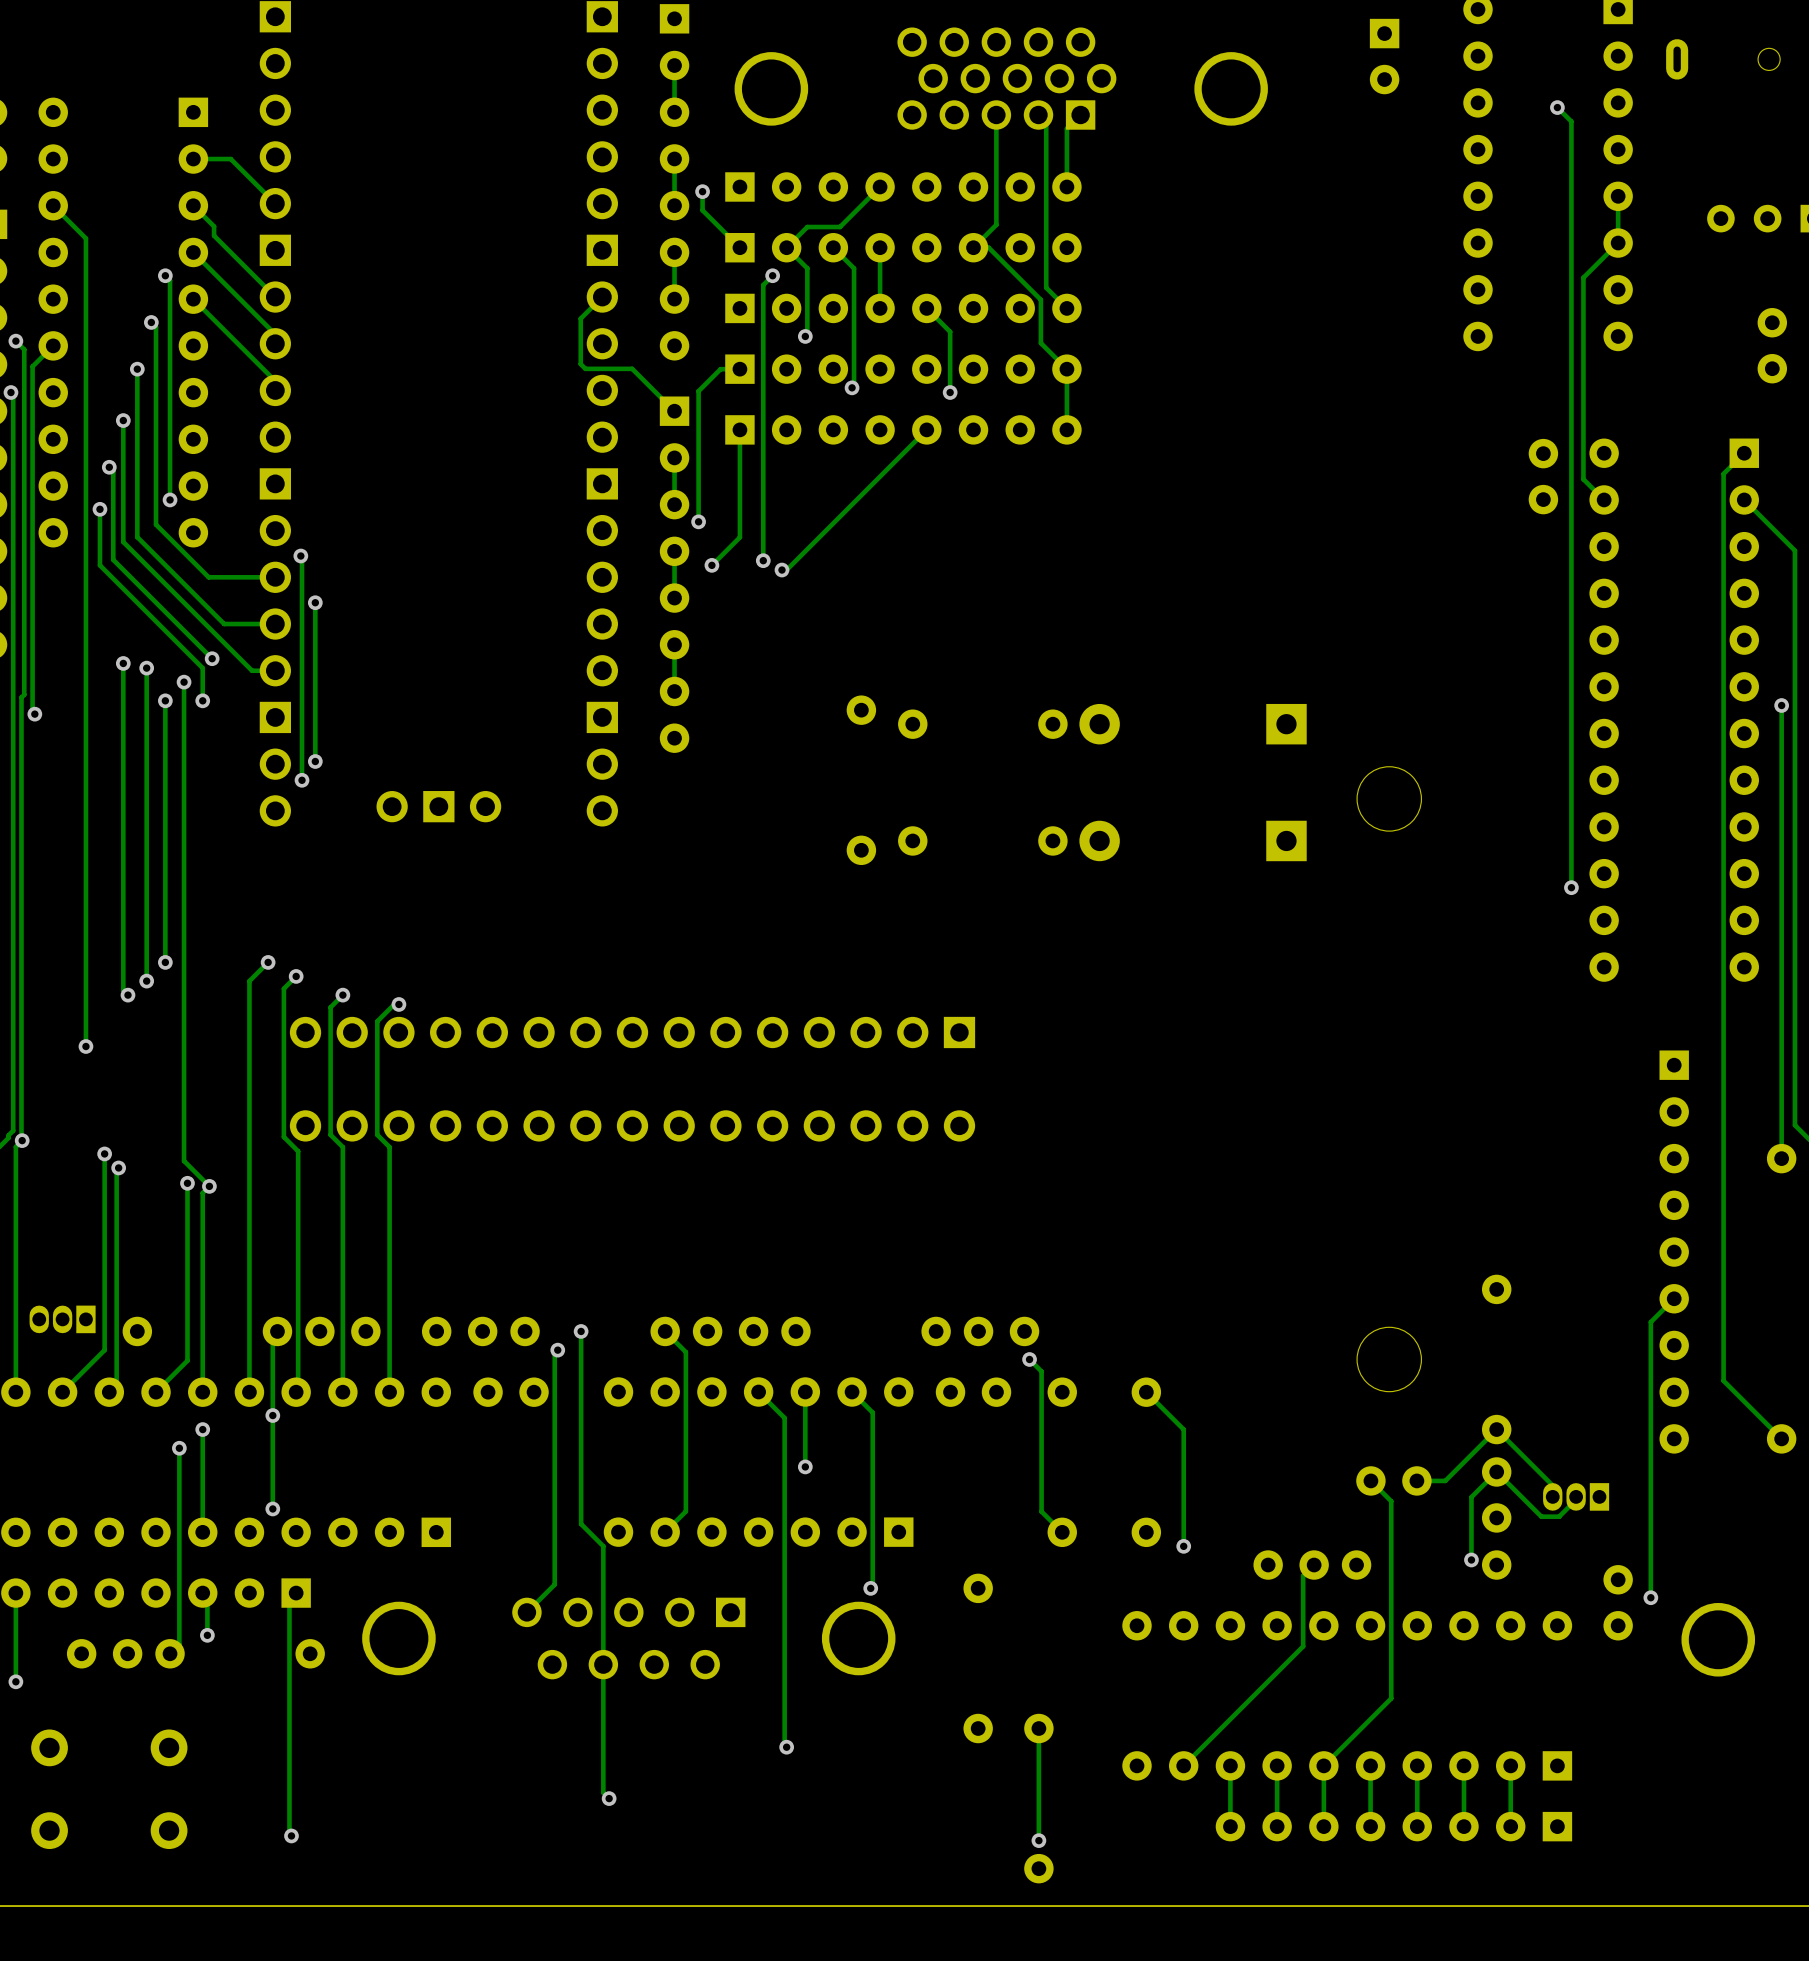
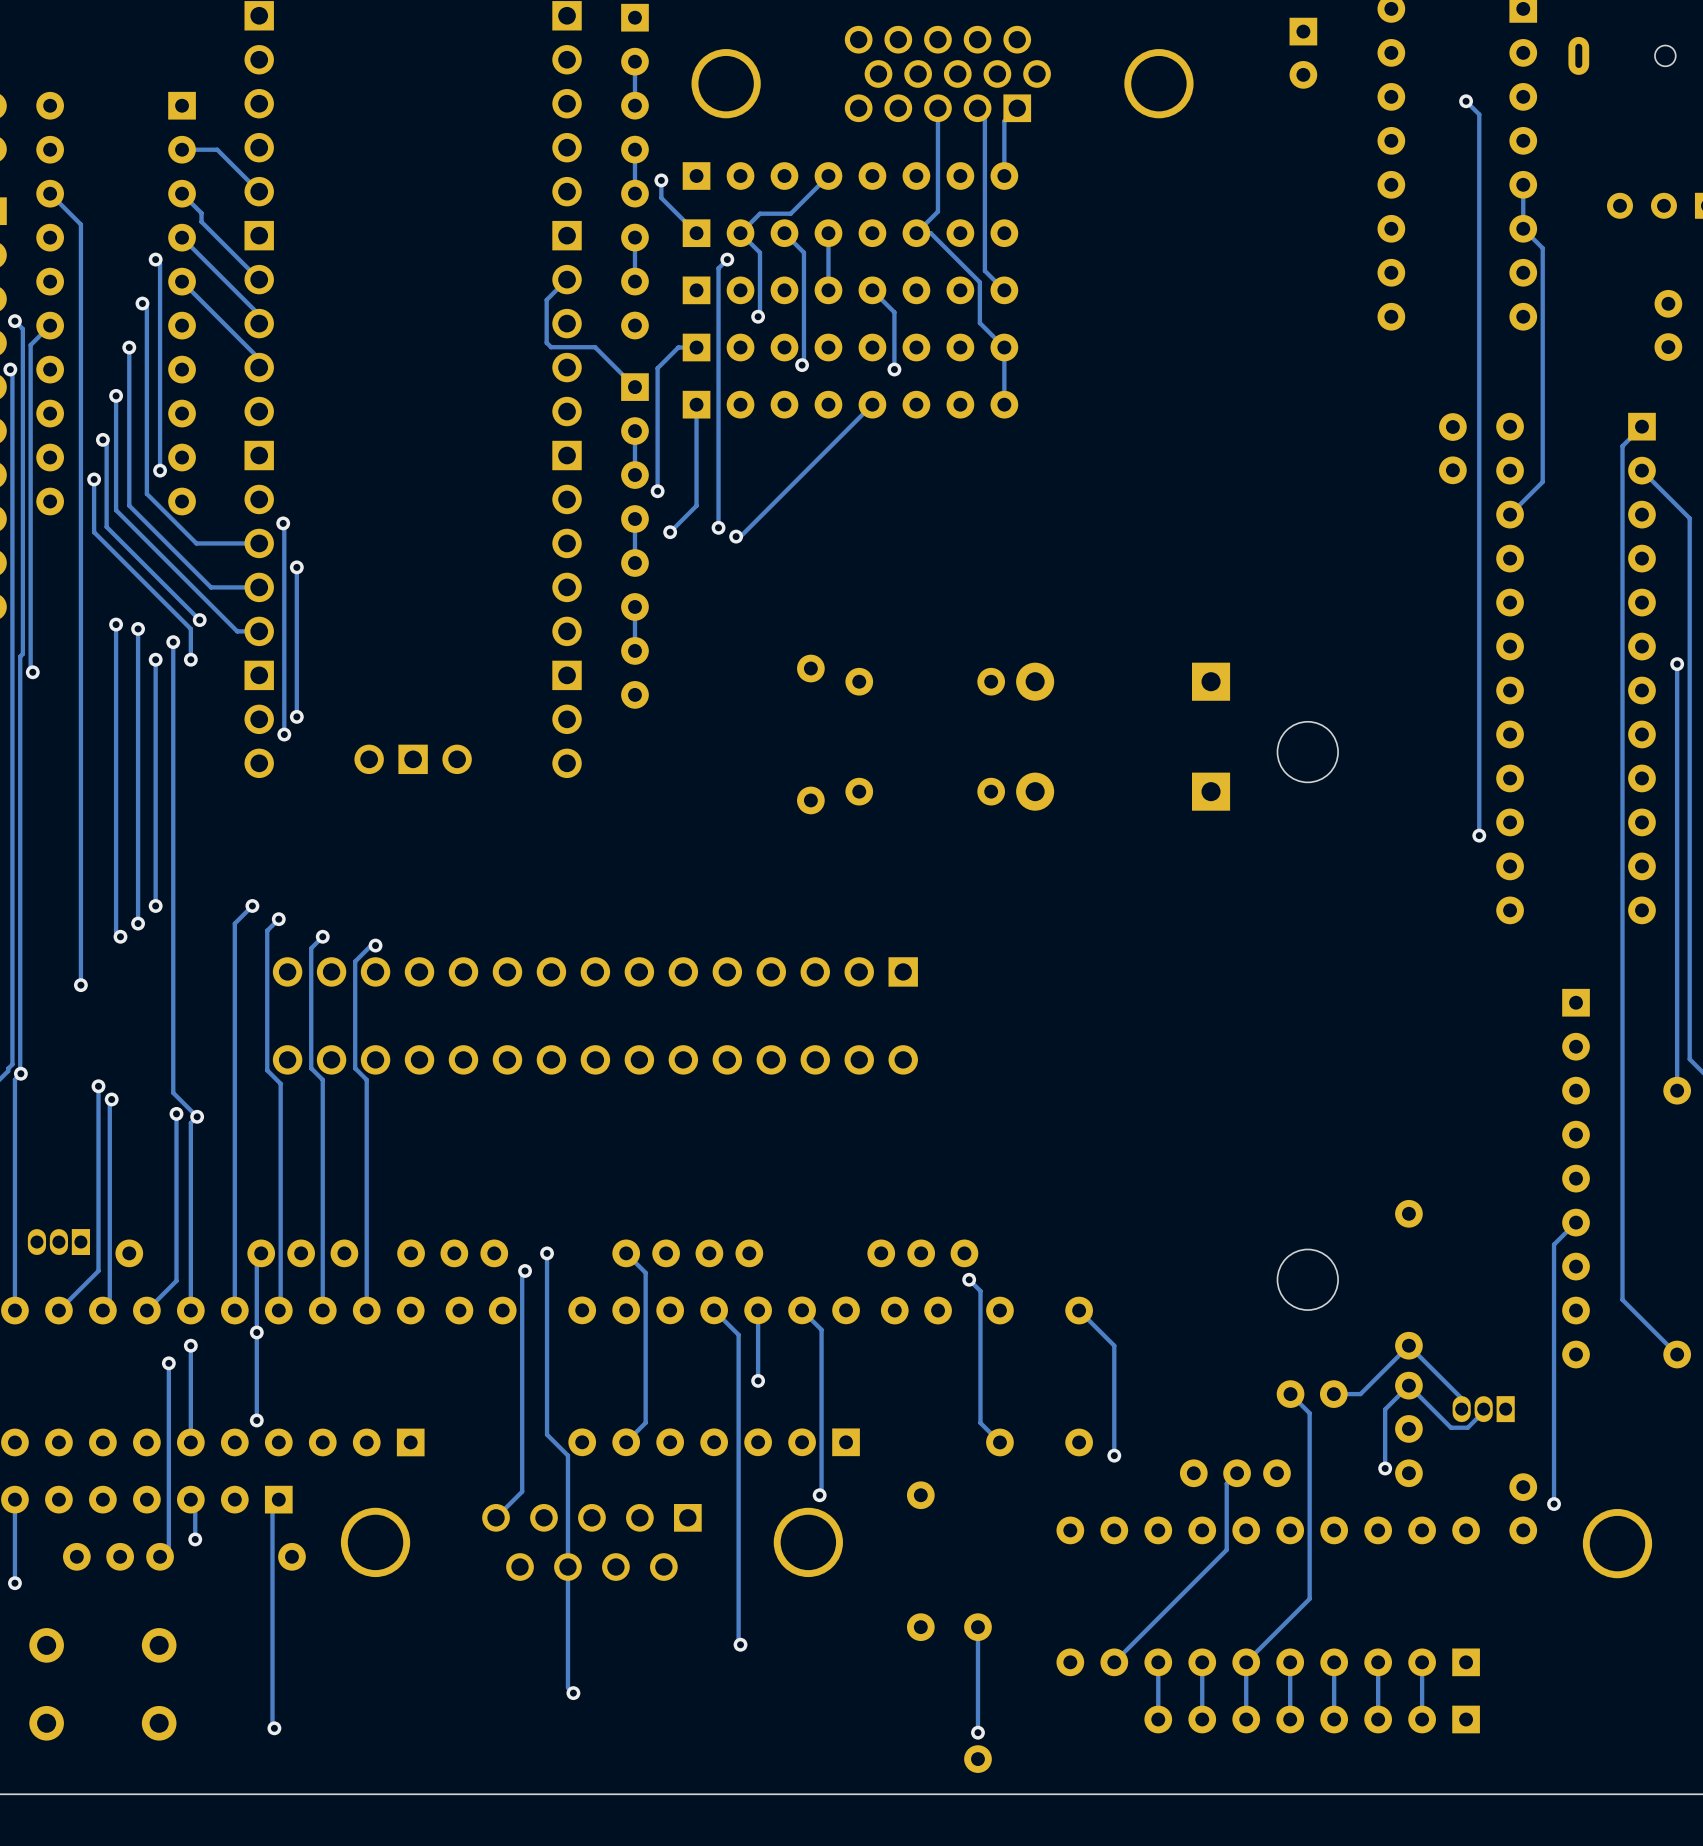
track: (1618, 243) (1583, 277) (1583, 479) (1604, 499) -> (1523, 228) (1542, 248) (1542, 481) (1510, 514)

